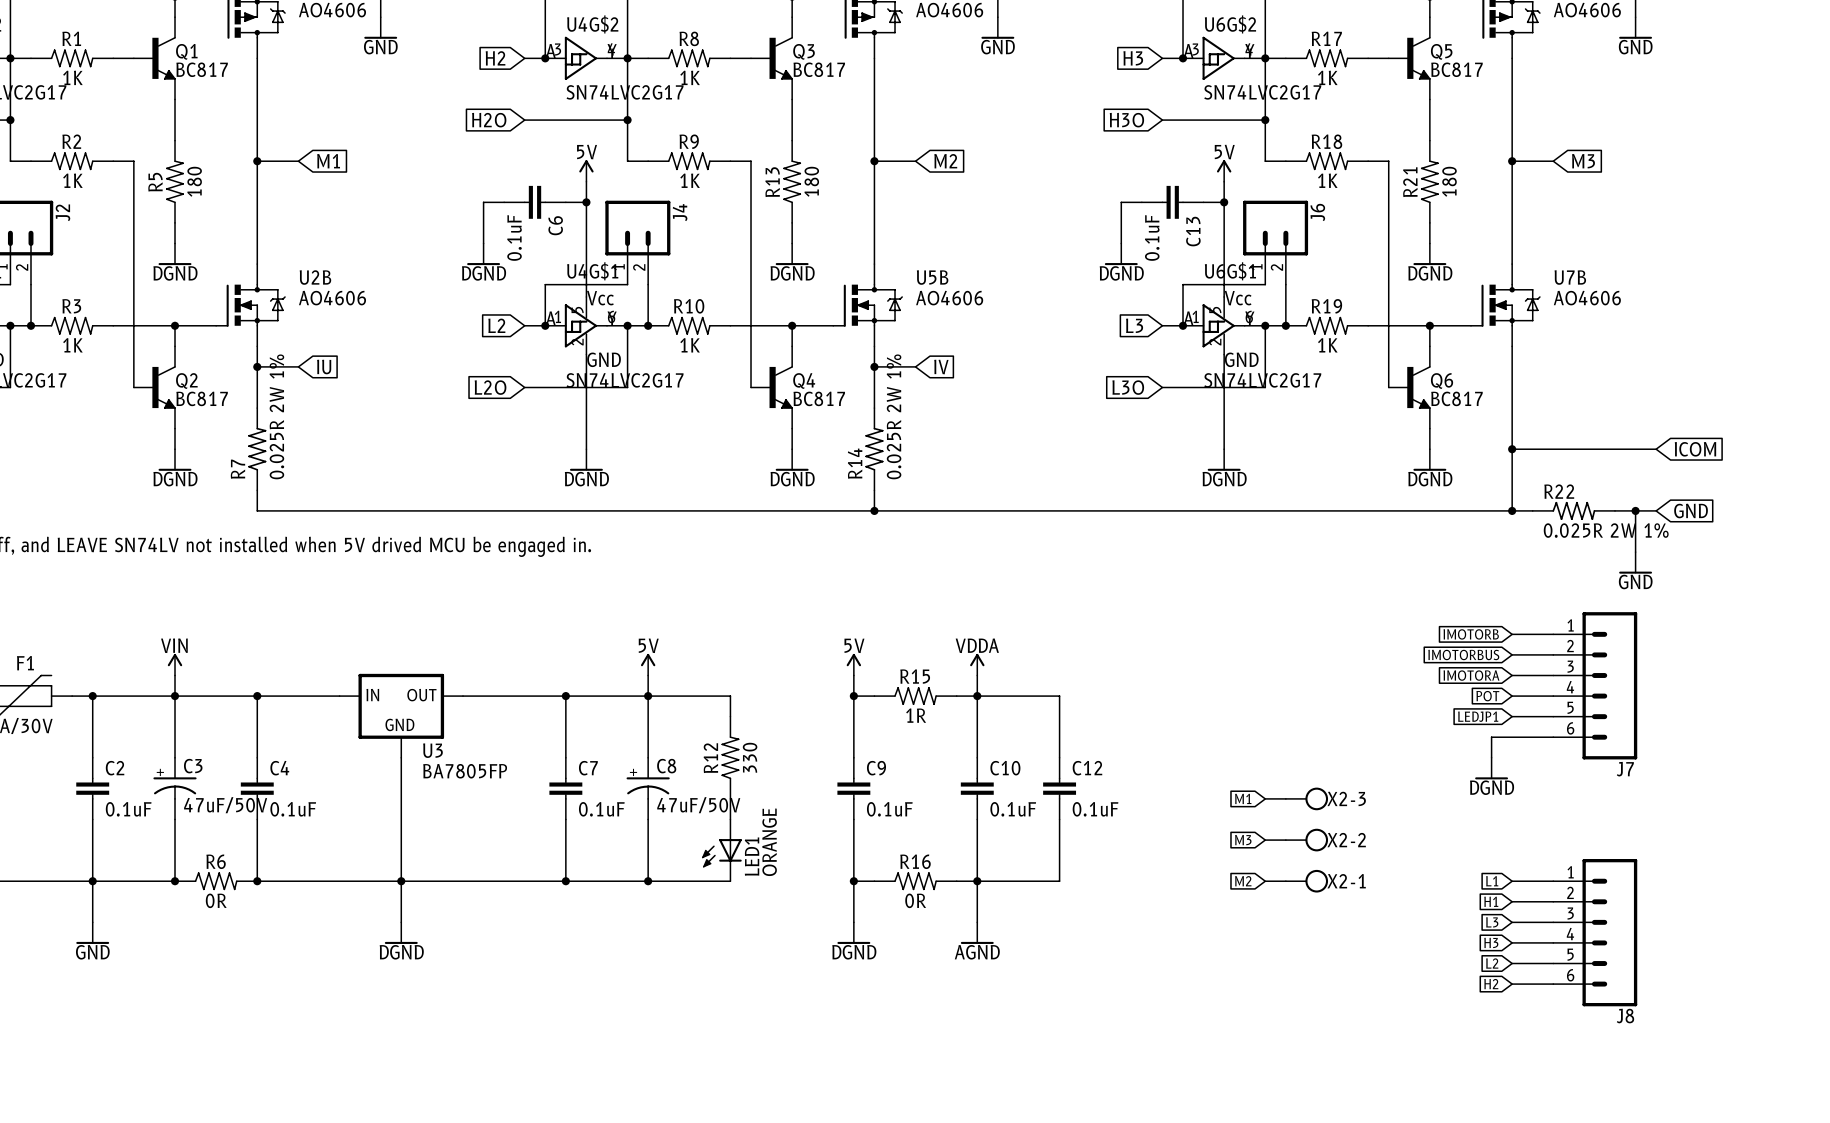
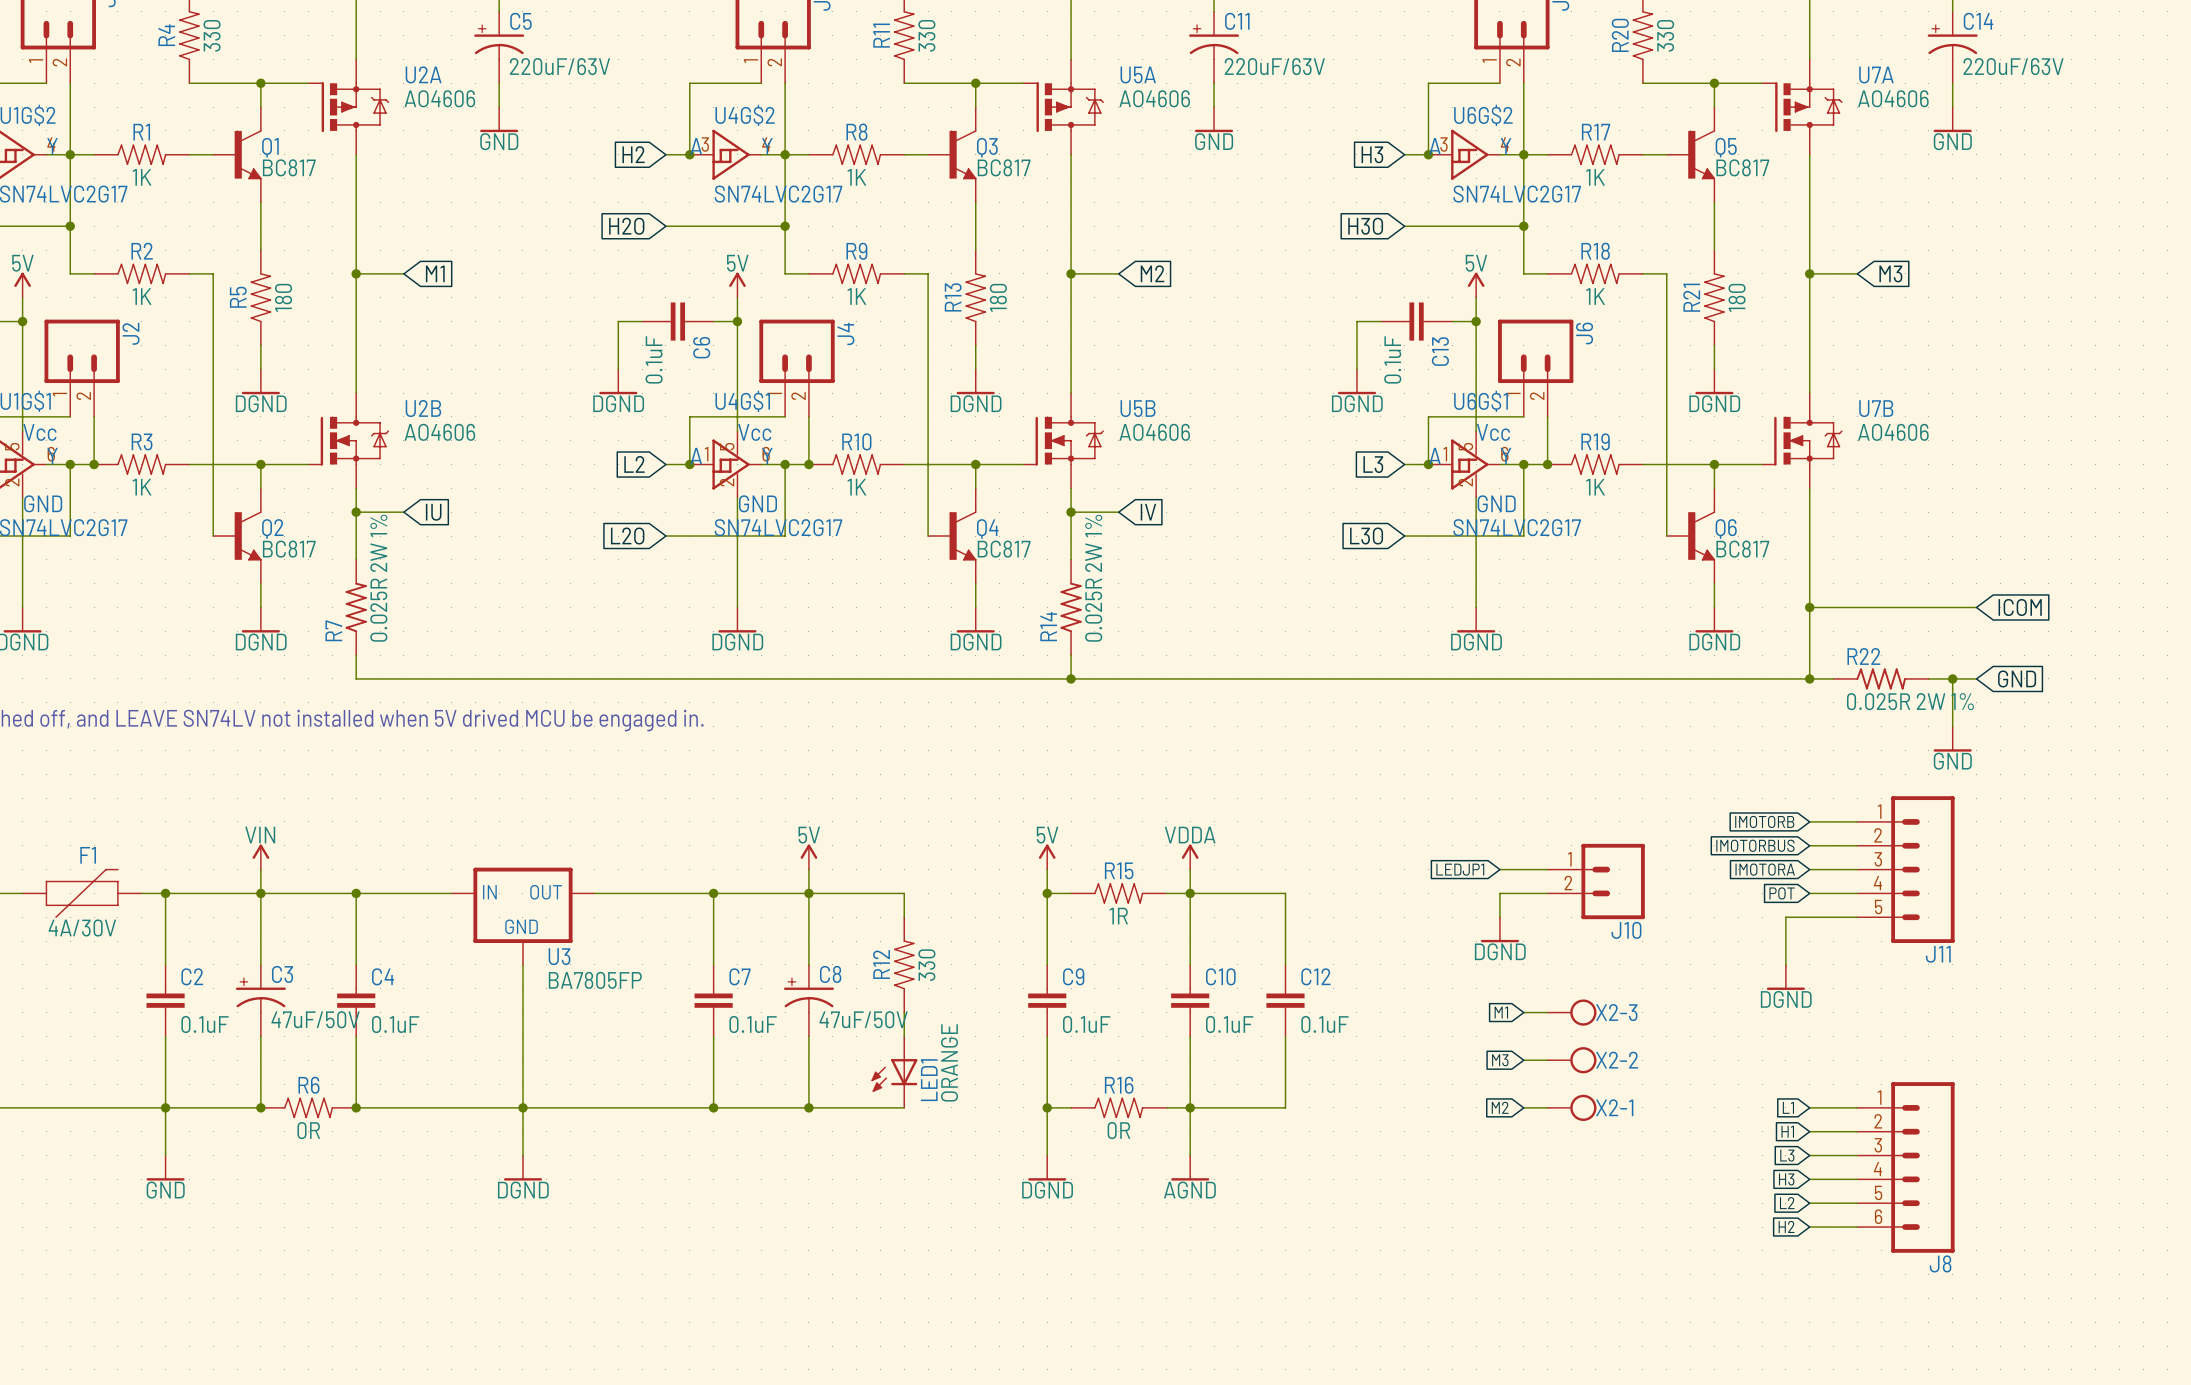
global label: none -> LEDJP1 (1460, 869)
wire: none -> (1499, 869) (1547, 869)
J11: none -> (1905, 869)
J10: none -> (1596, 881)
J7: (1595, 685) -> none
wire: none -> (1547, 893) (1499, 893) (1499, 917)
global label: LEDJP1 (1478, 716) -> none
power symbol: none -> DGND (1499, 929)
wire: (1491, 737) (1553, 737) -> (1785, 941) (1785, 917) (1809, 917)

